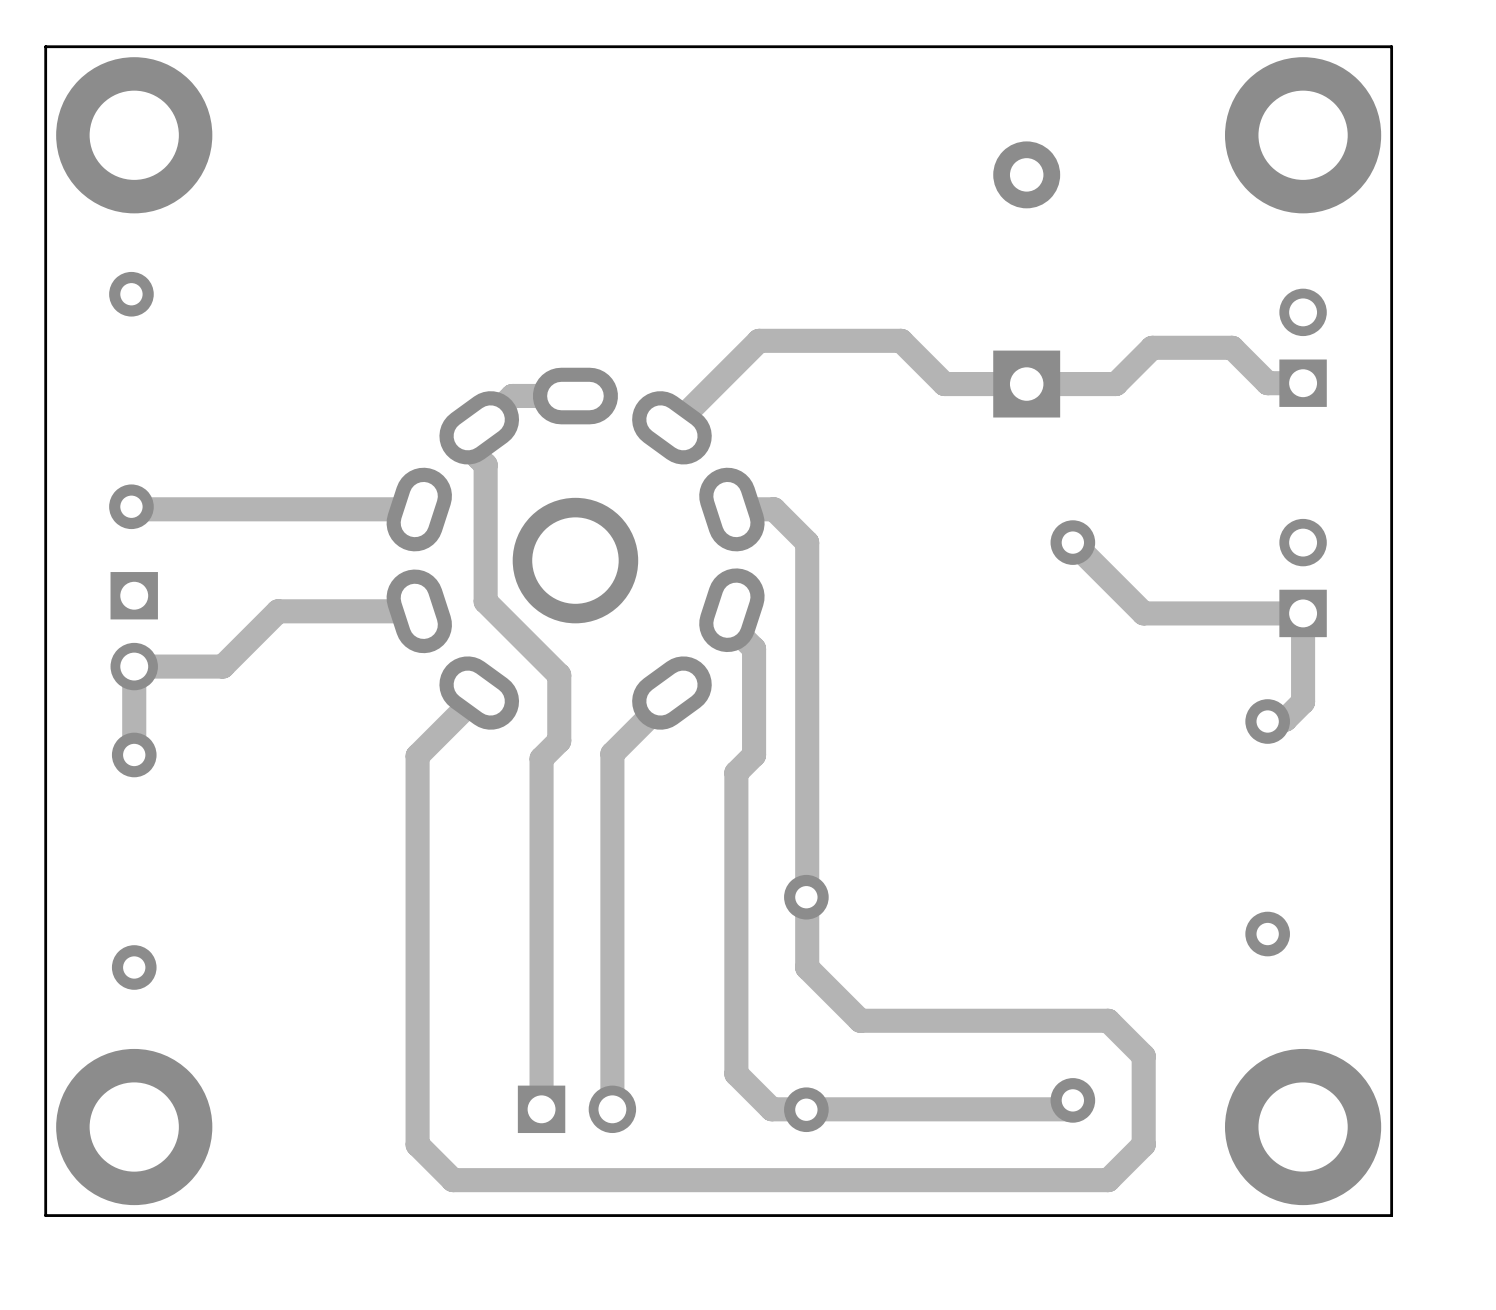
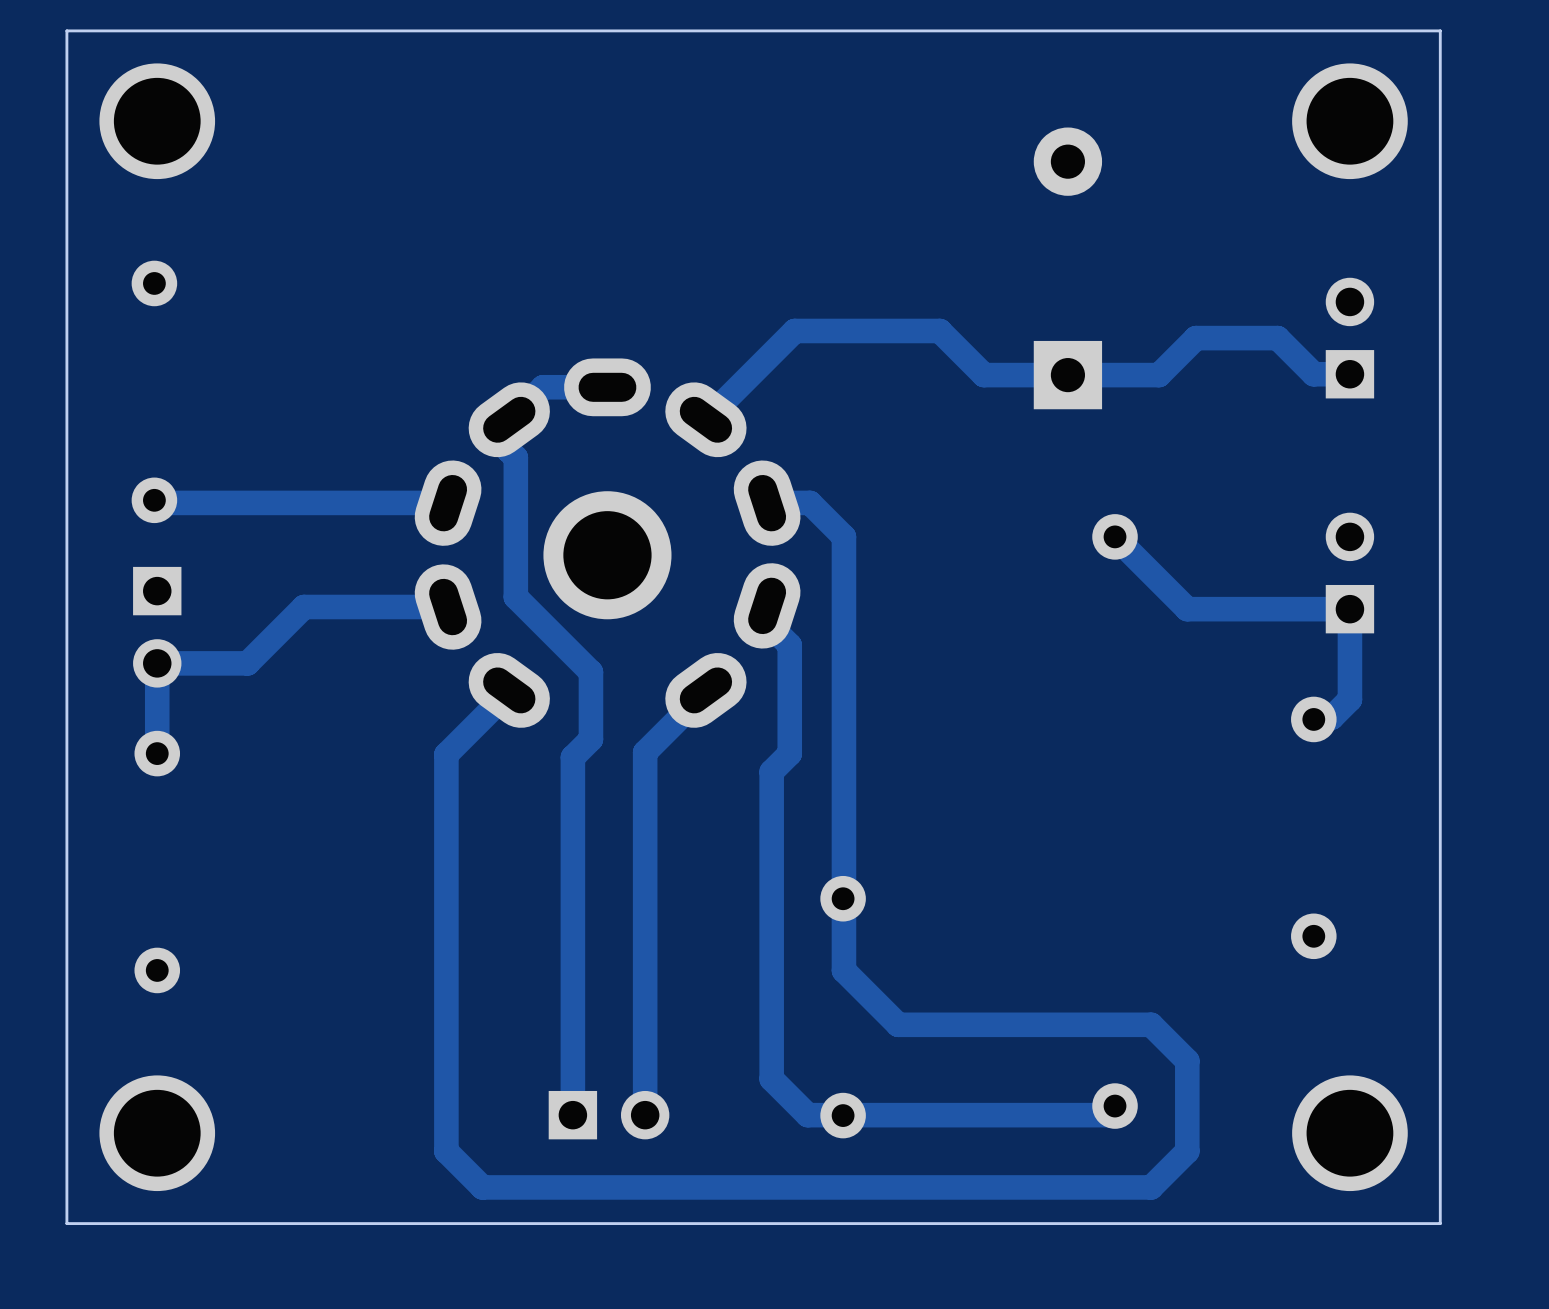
part footprint: [56, 57, 213, 214] -> [99, 63, 216, 180]
part footprint: [1224, 57, 1382, 214] -> [1292, 63, 1408, 180]
part footprint: [56, 1048, 213, 1206] -> [99, 1075, 216, 1192]
part footprint: [1224, 1048, 1382, 1206] -> [1292, 1075, 1408, 1192]

